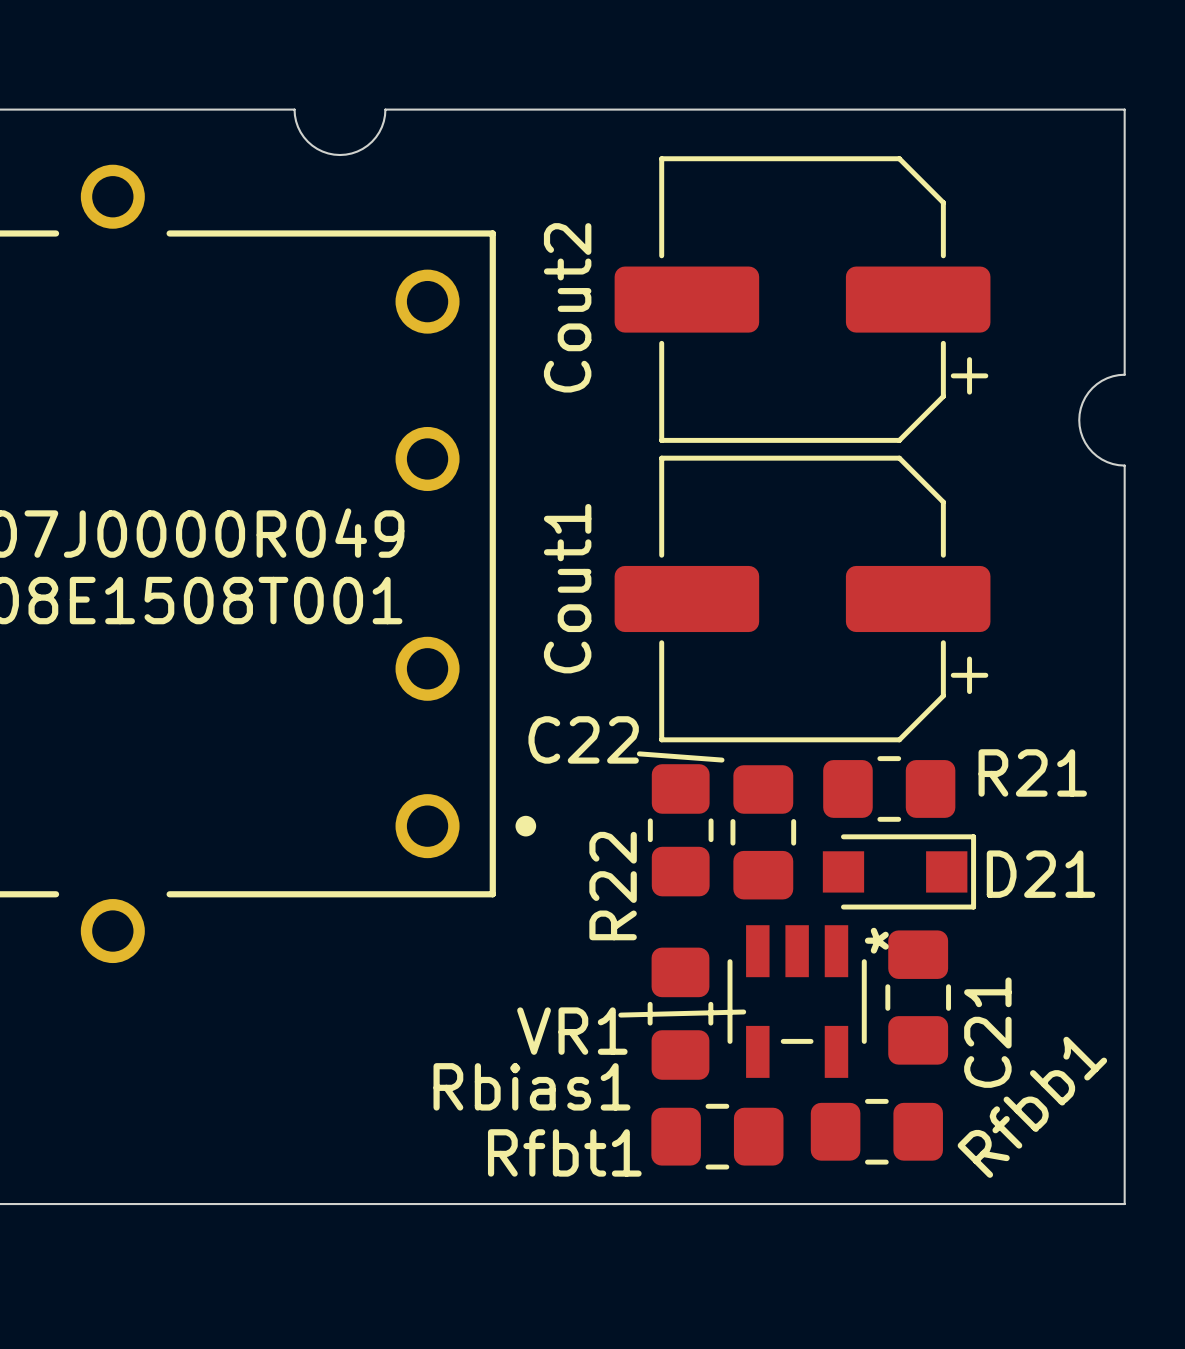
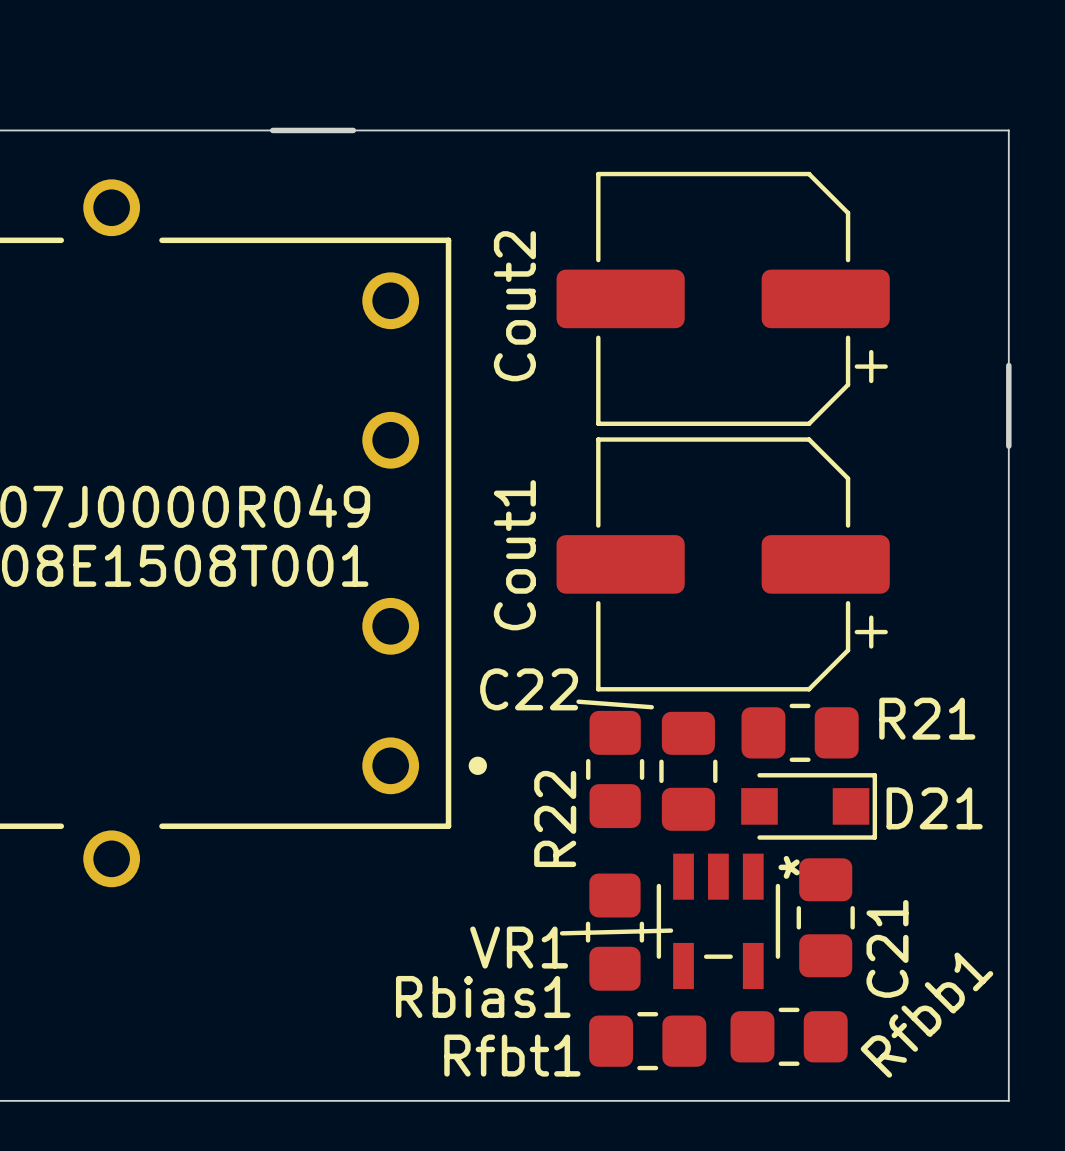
board edge: (294, 109) (298, 126) (307, 141) (322, 151) (339, 155) (357, 151) (372, 141) (381, 126) (385, 109) -> (272, 130) (353, 130)
board edge: (1124, 374) (1107, 378) (1092, 388) (1082, 402) (1079, 420) (1082, 437) (1092, 452) (1107, 462) (1124, 465) -> (1008, 365) (1008, 446)

